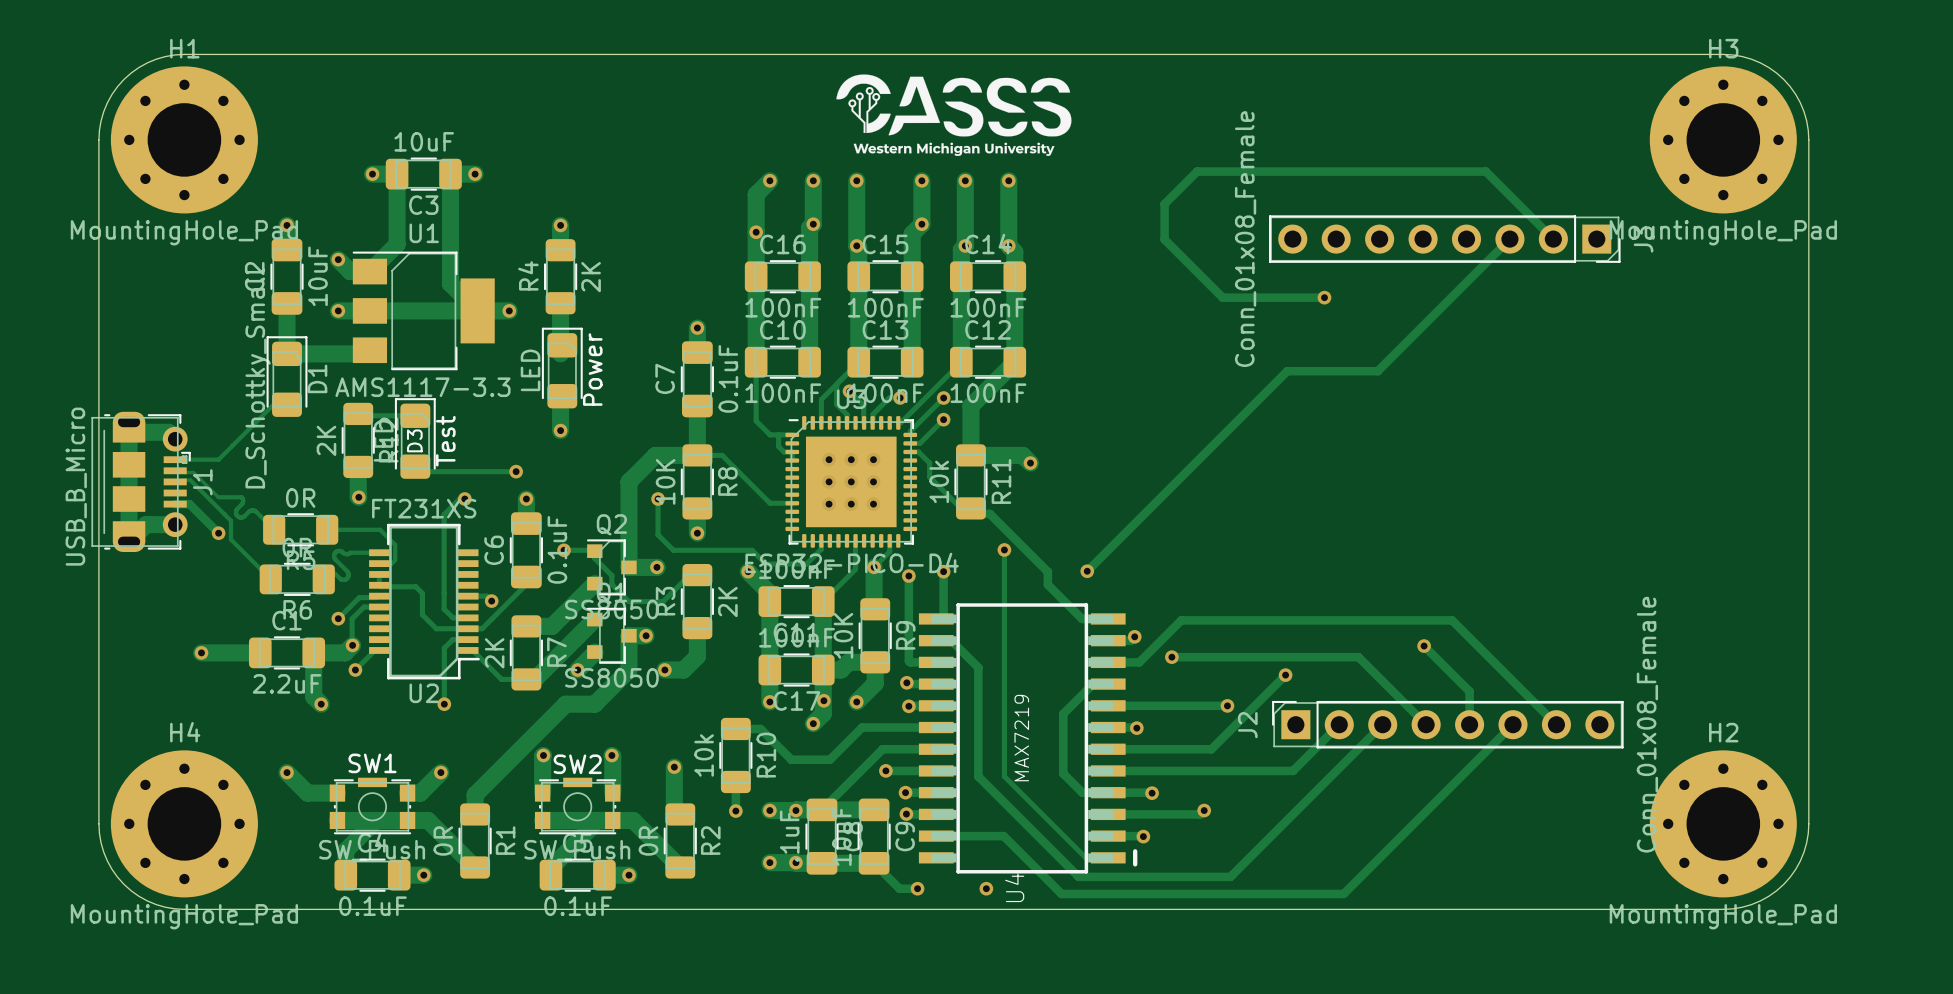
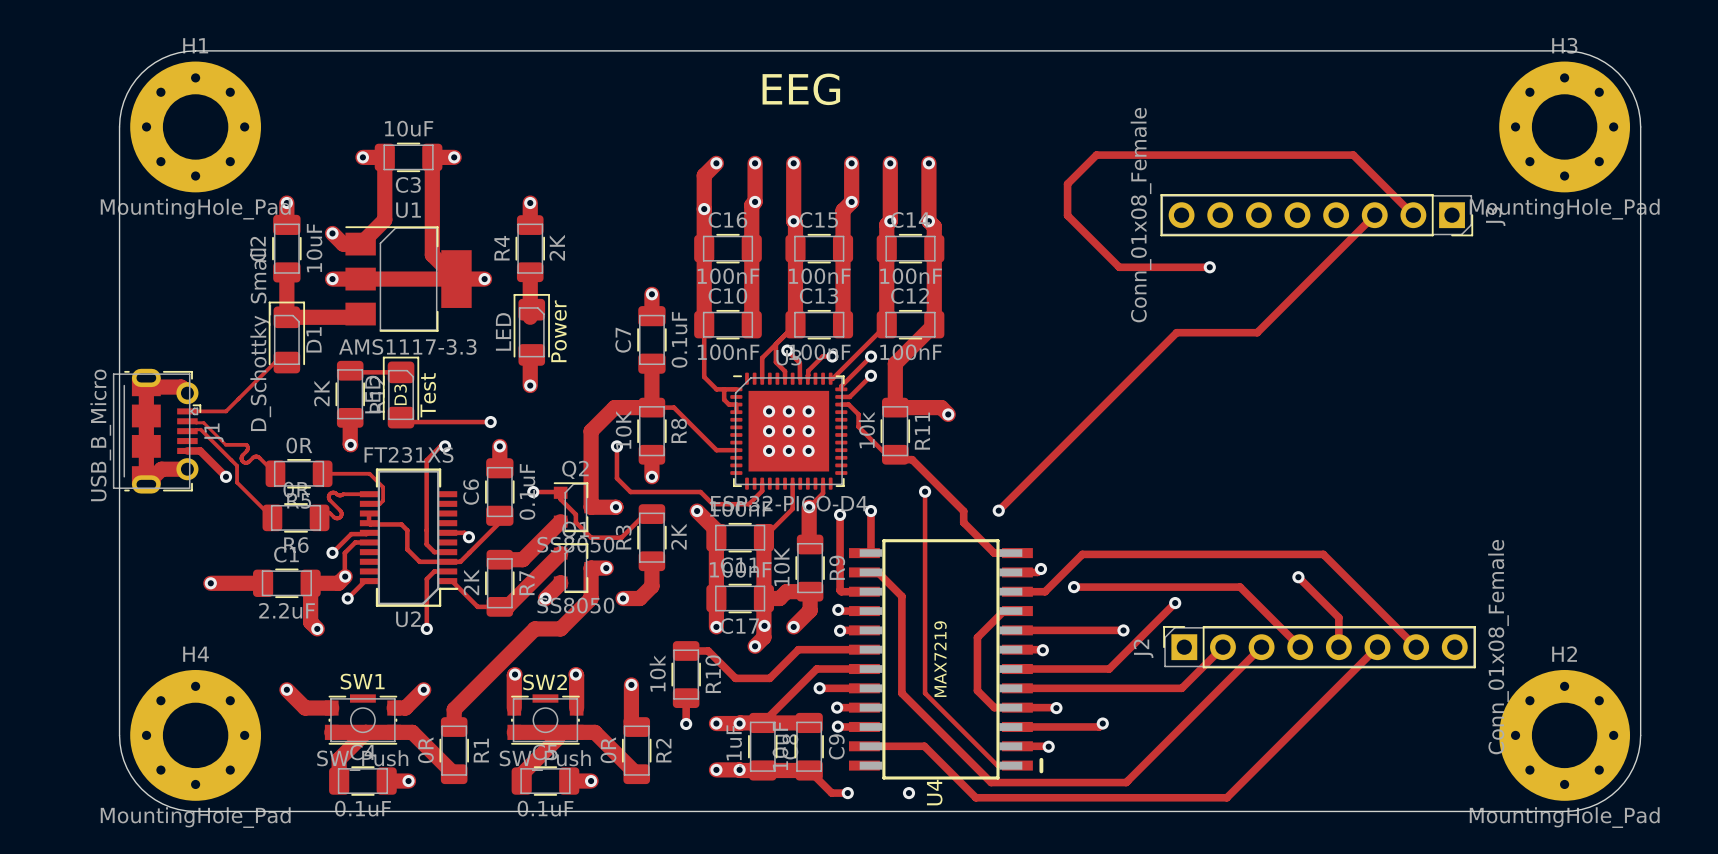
drawing: [836, 74, 1072, 157] -> none
text: none -> EEG (801, 89)

